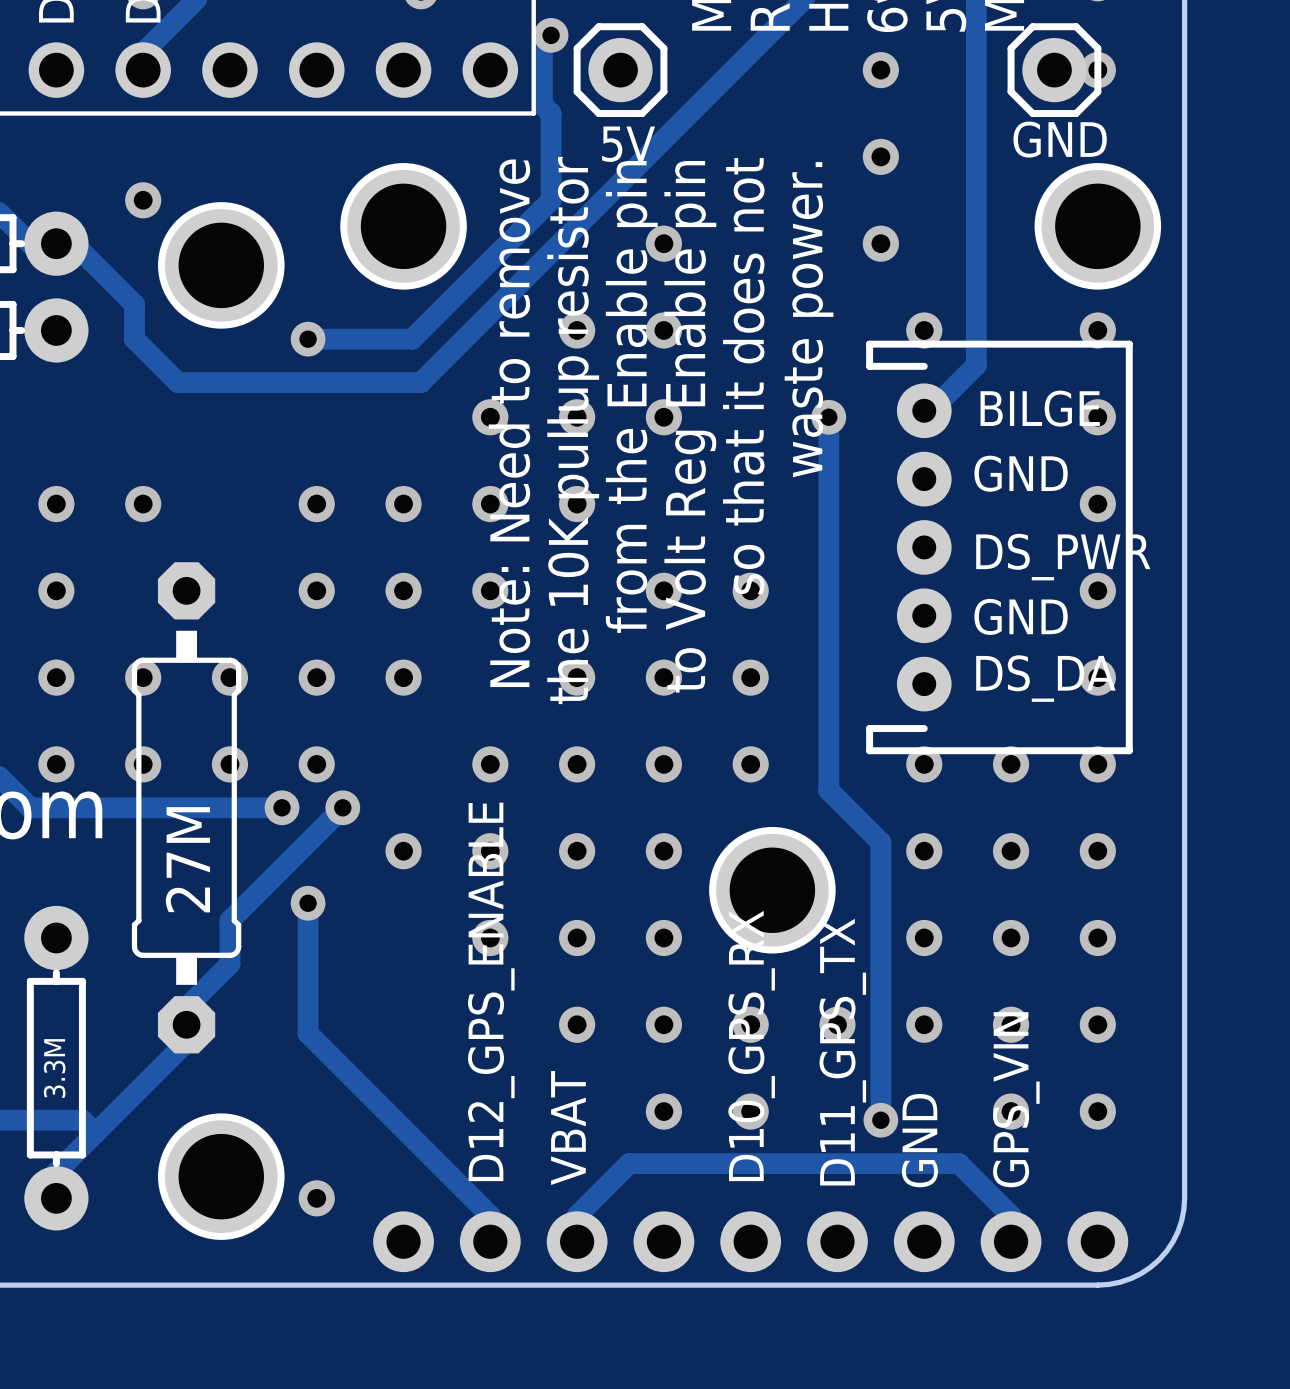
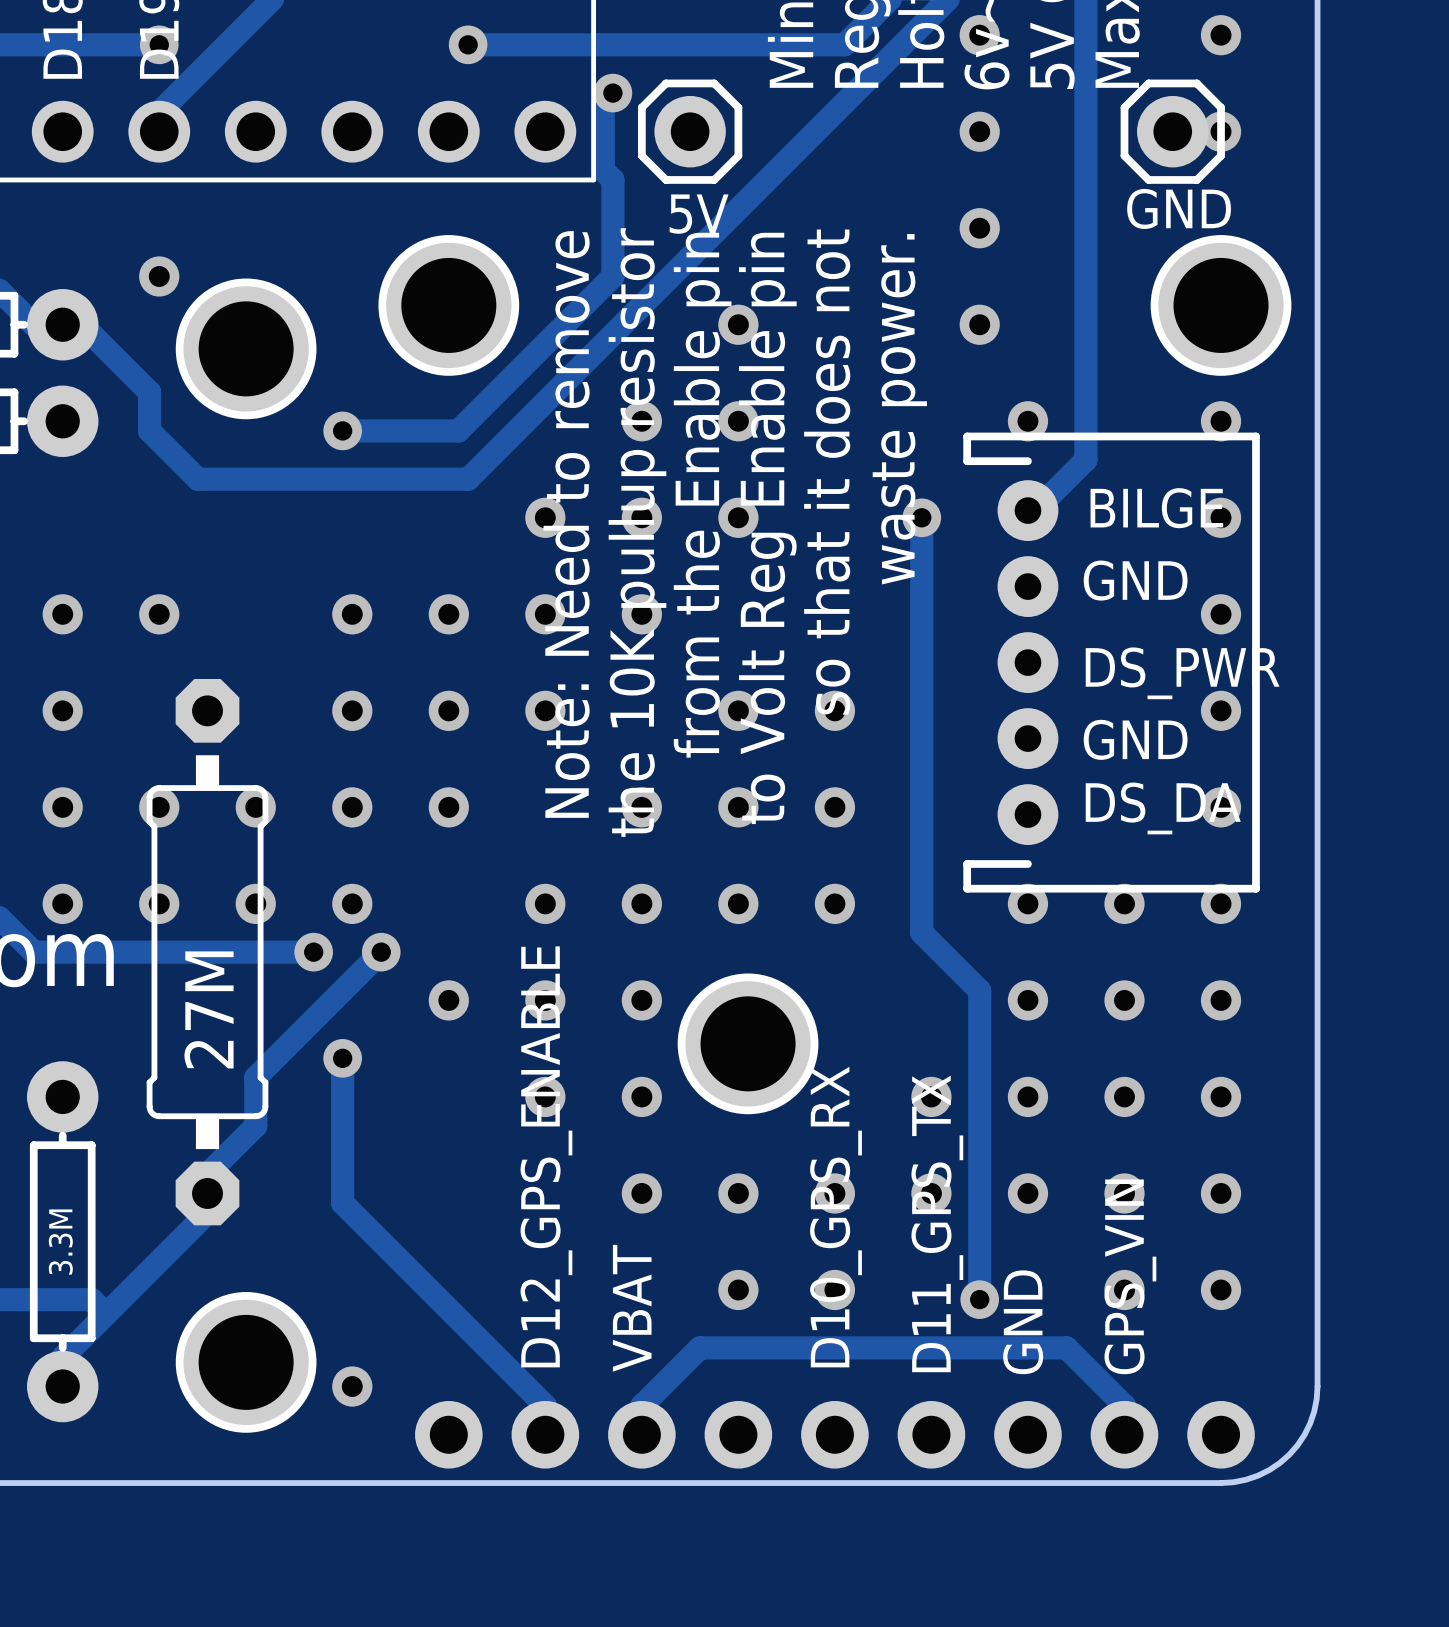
via: (663, 851) -> none
part position: (772, 890) -> (748, 1043)
via: (663, 937) -> none
via: none -> (931, 1096)

